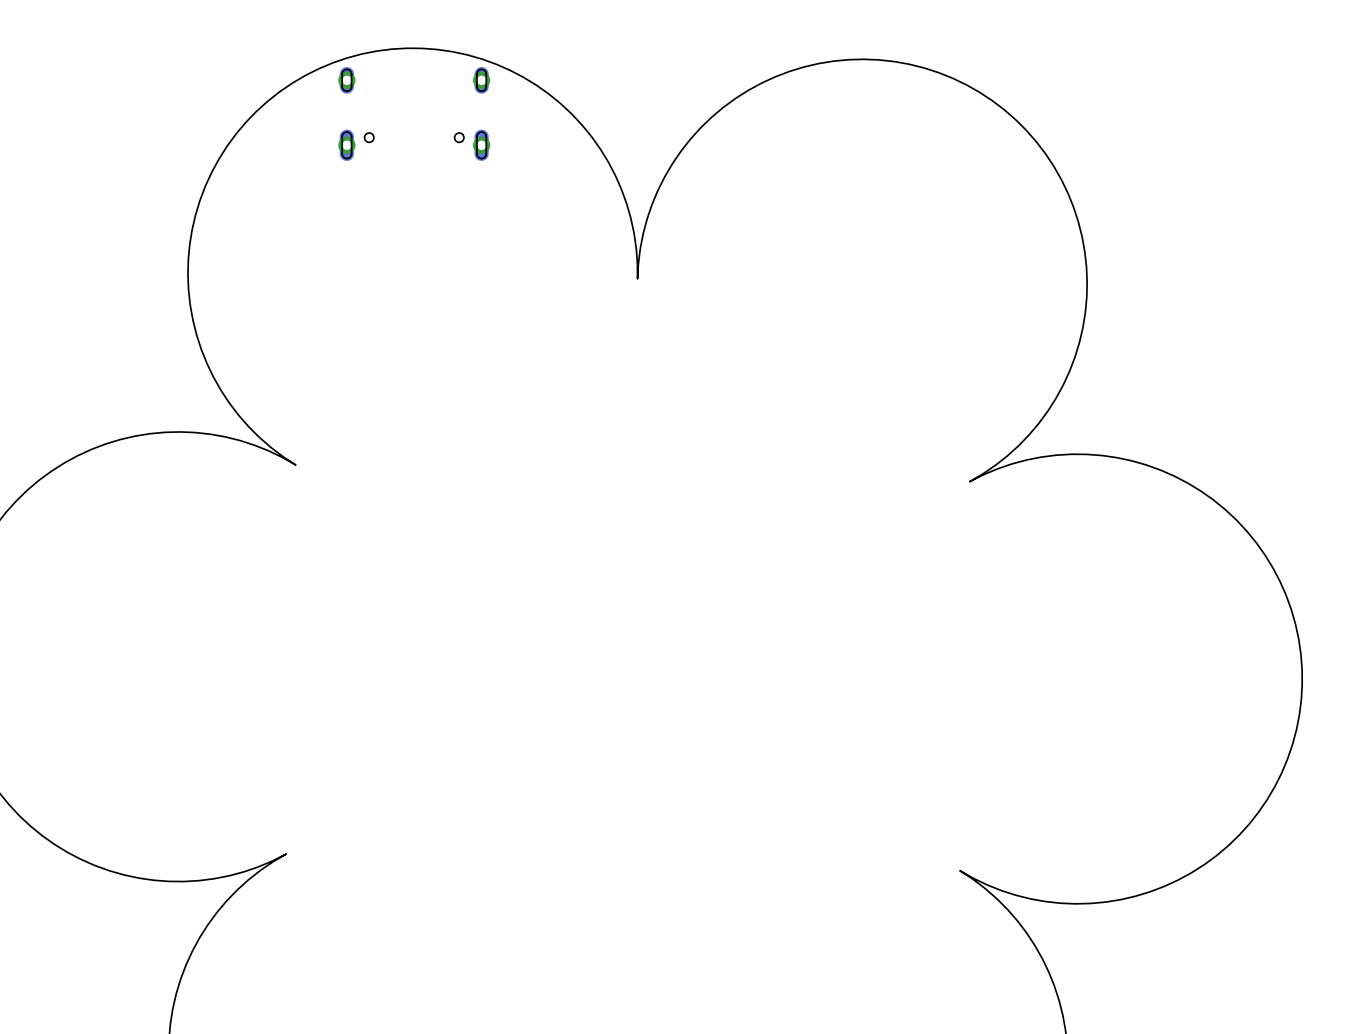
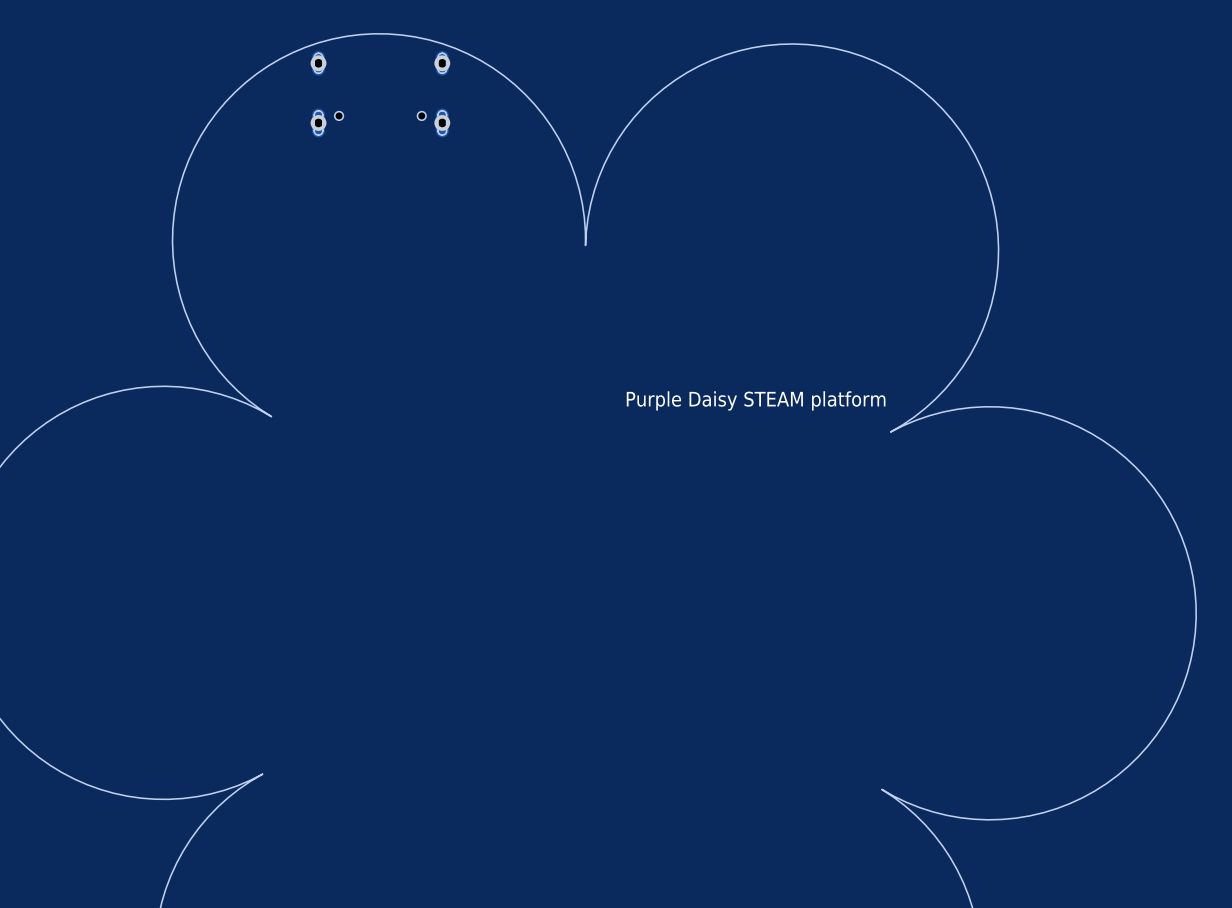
text: none -> Purple Daisy STEAM platform (756, 400)

